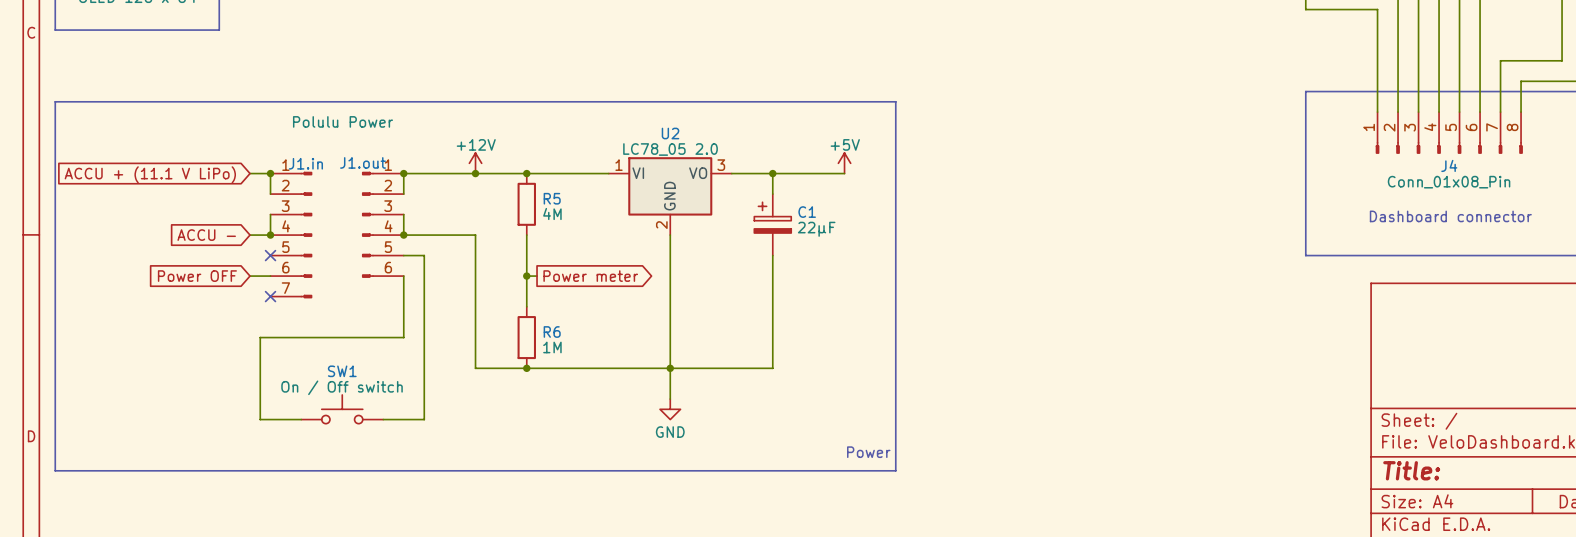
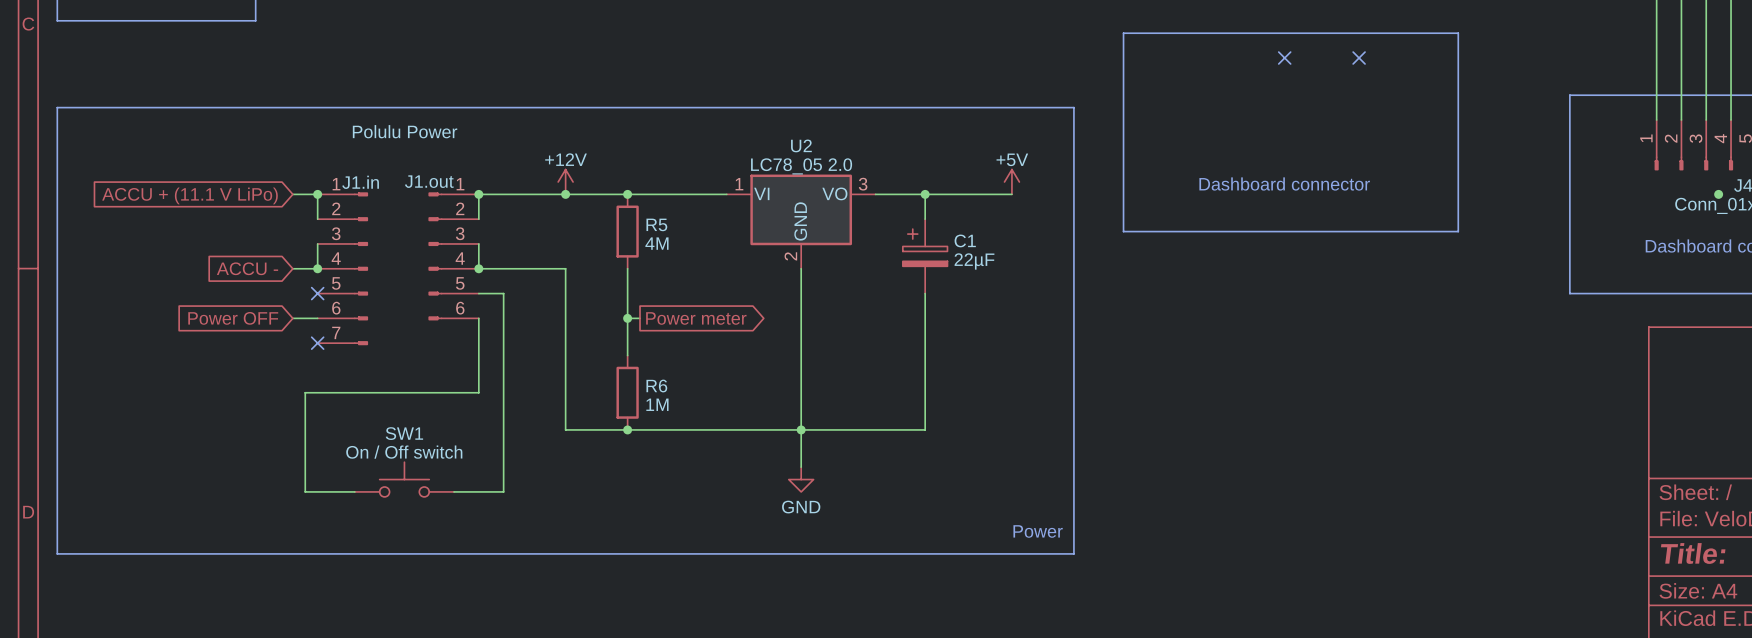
line: none -> (1123, 33) (1458, 33) (1458, 231) (1123, 231) (1123, 33)
no-connect mark: none -> (1284, 58)
no-connect mark: none -> (1359, 58)
text: none -> Dashboard connector (1284, 183)
junction: none -> (1718, 194)

